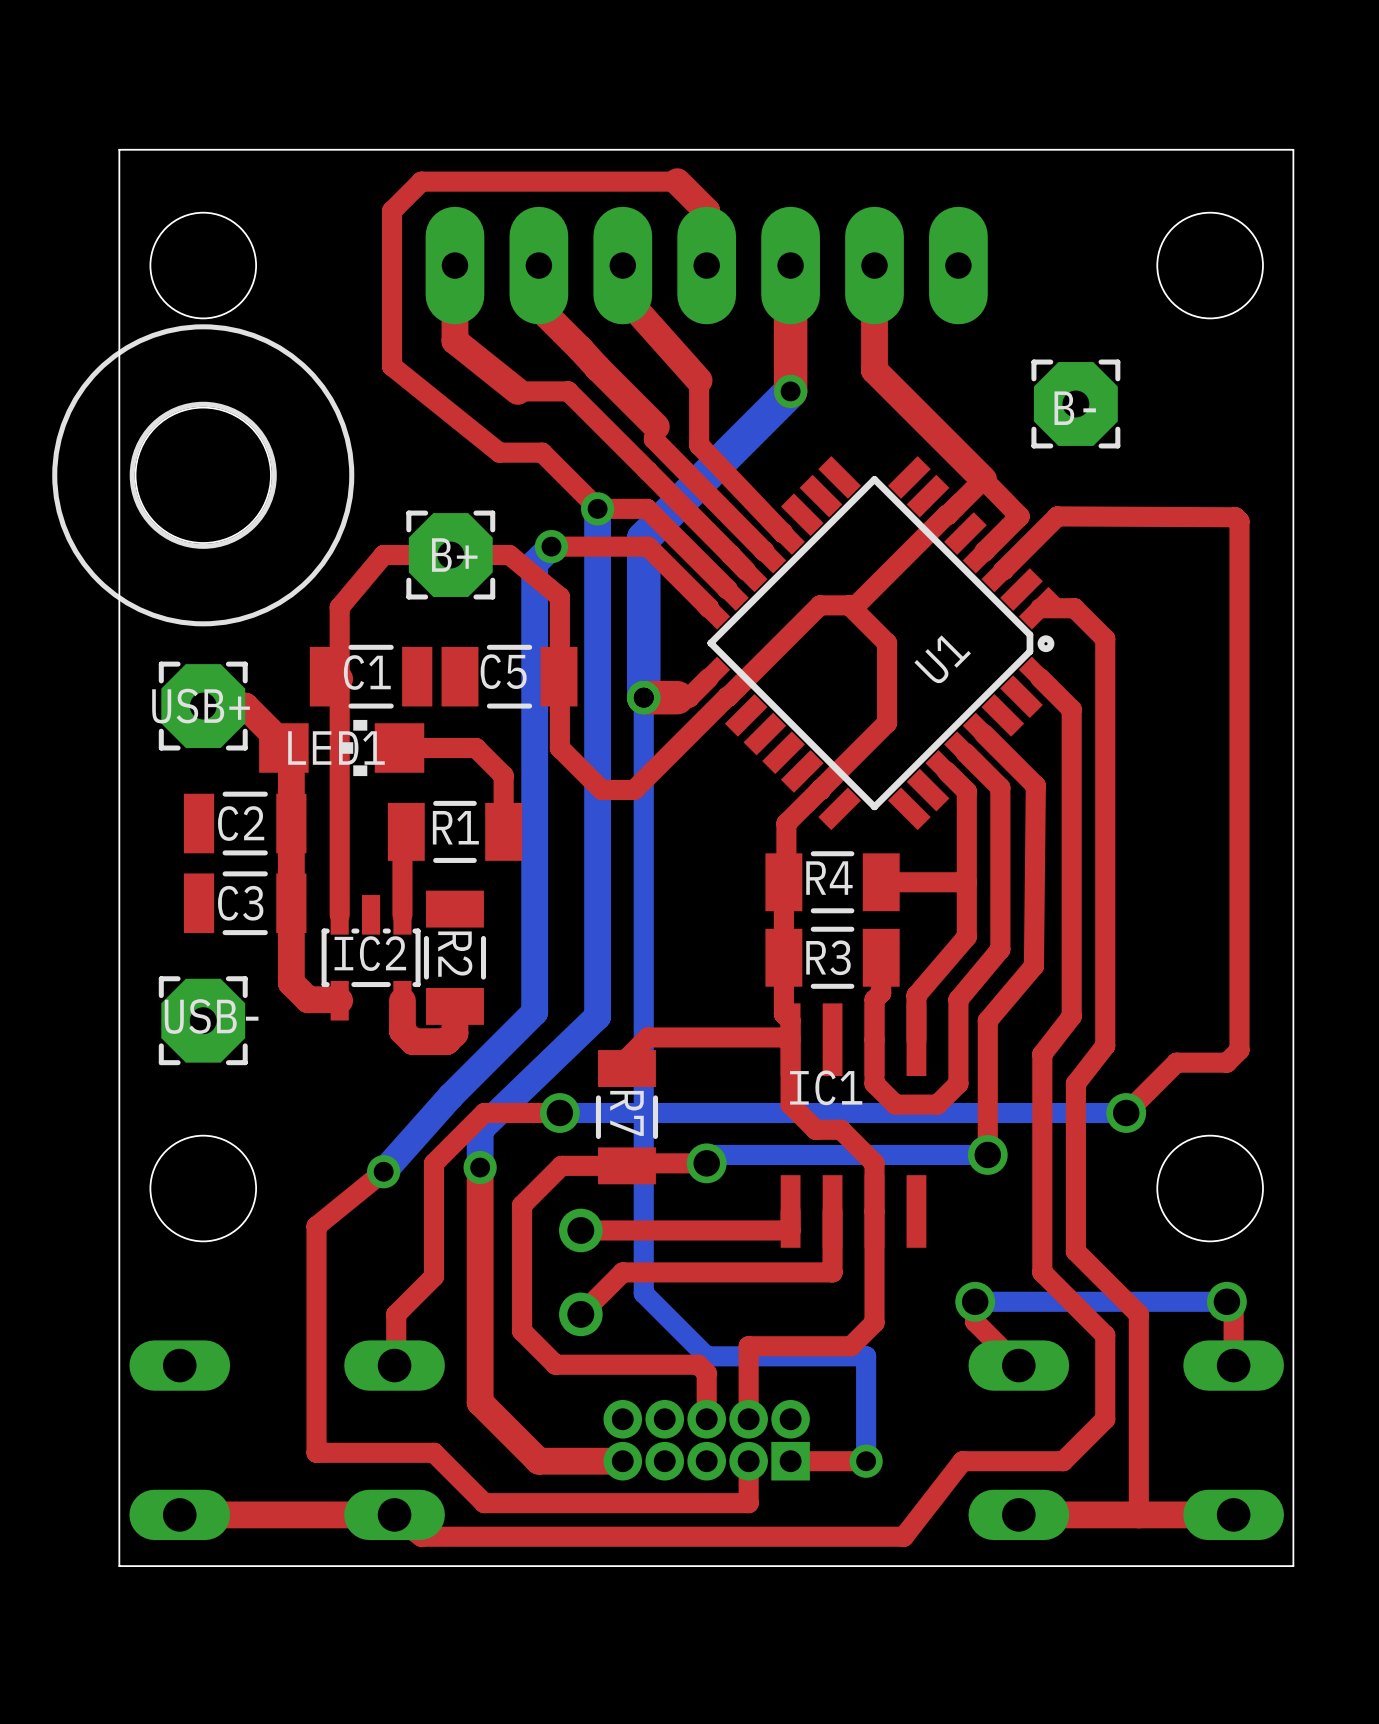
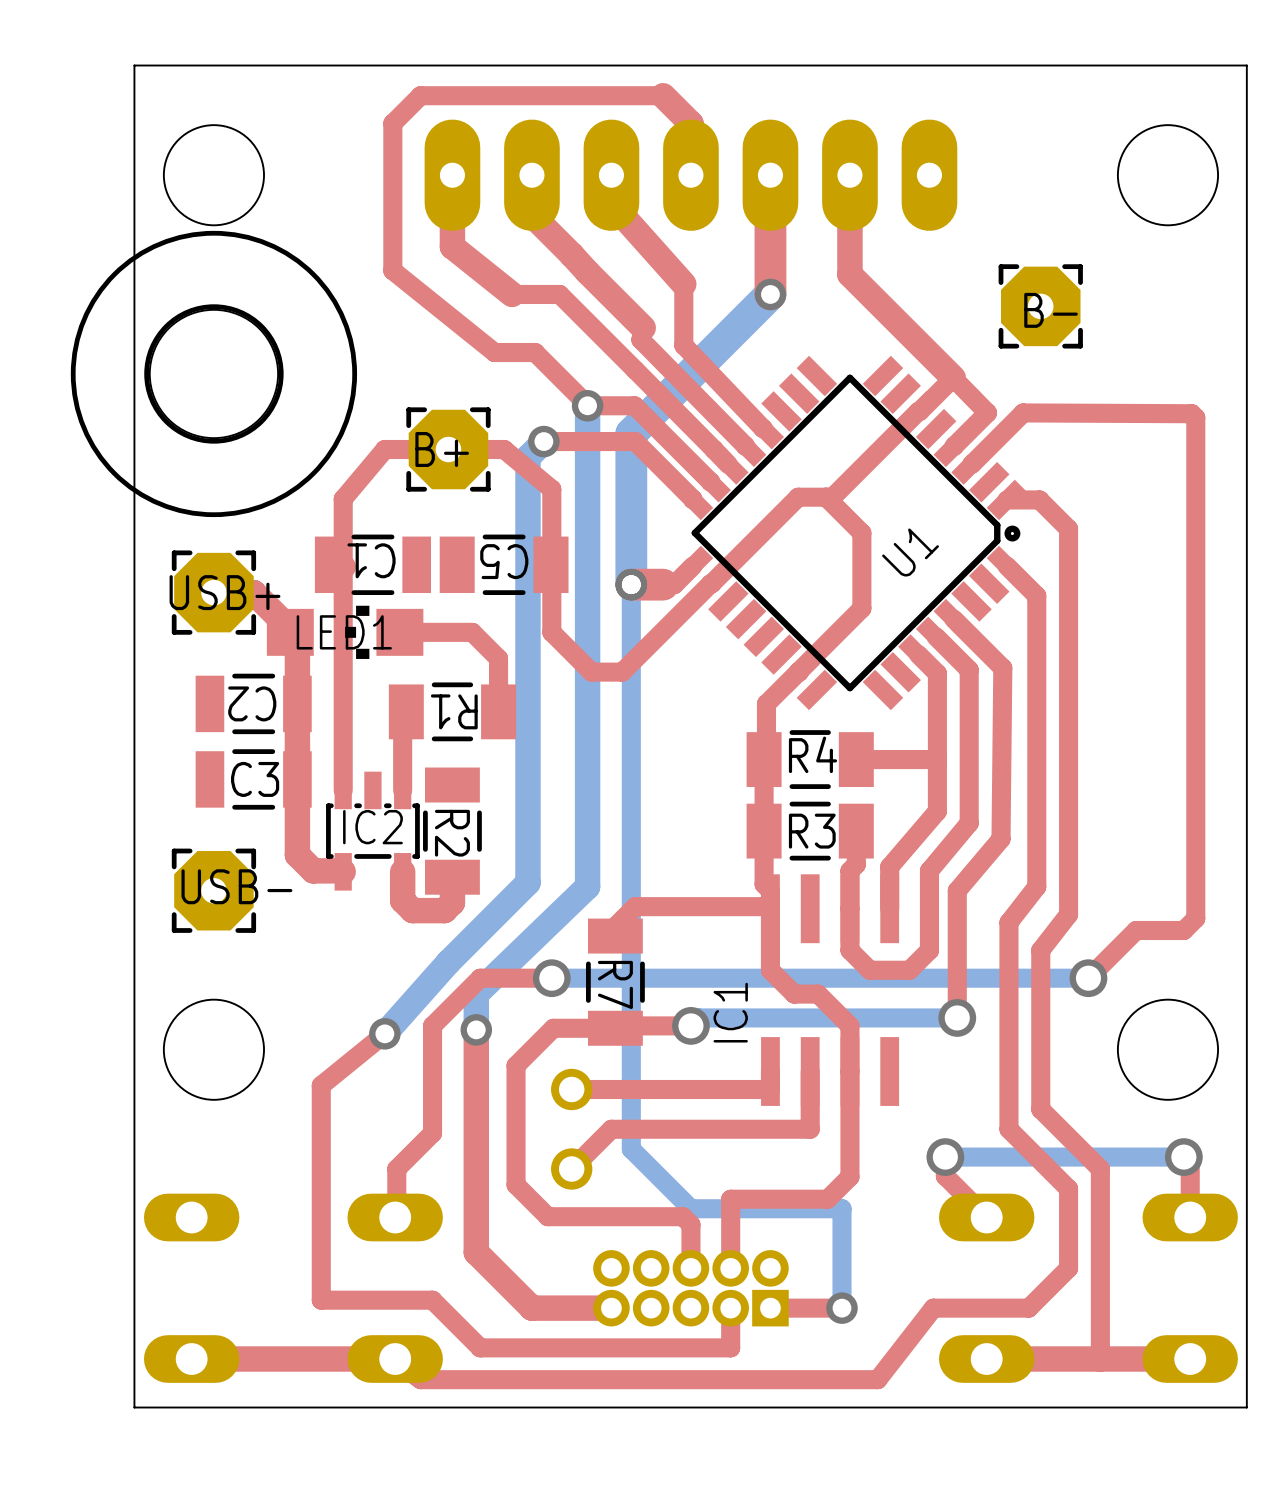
C5 name rotation: 0° (503, 671) -> 180° (504, 561)
C1 name rotation: 0° (367, 672) -> 180° (371, 560)
C2 name rotation: 0° (241, 823) -> 180° (252, 703)
R1 name rotation: 0° (455, 827) -> 180° (454, 711)
IC1 name rotation: 0° (826, 1087) -> 90° counterclockwise (730, 1012)

